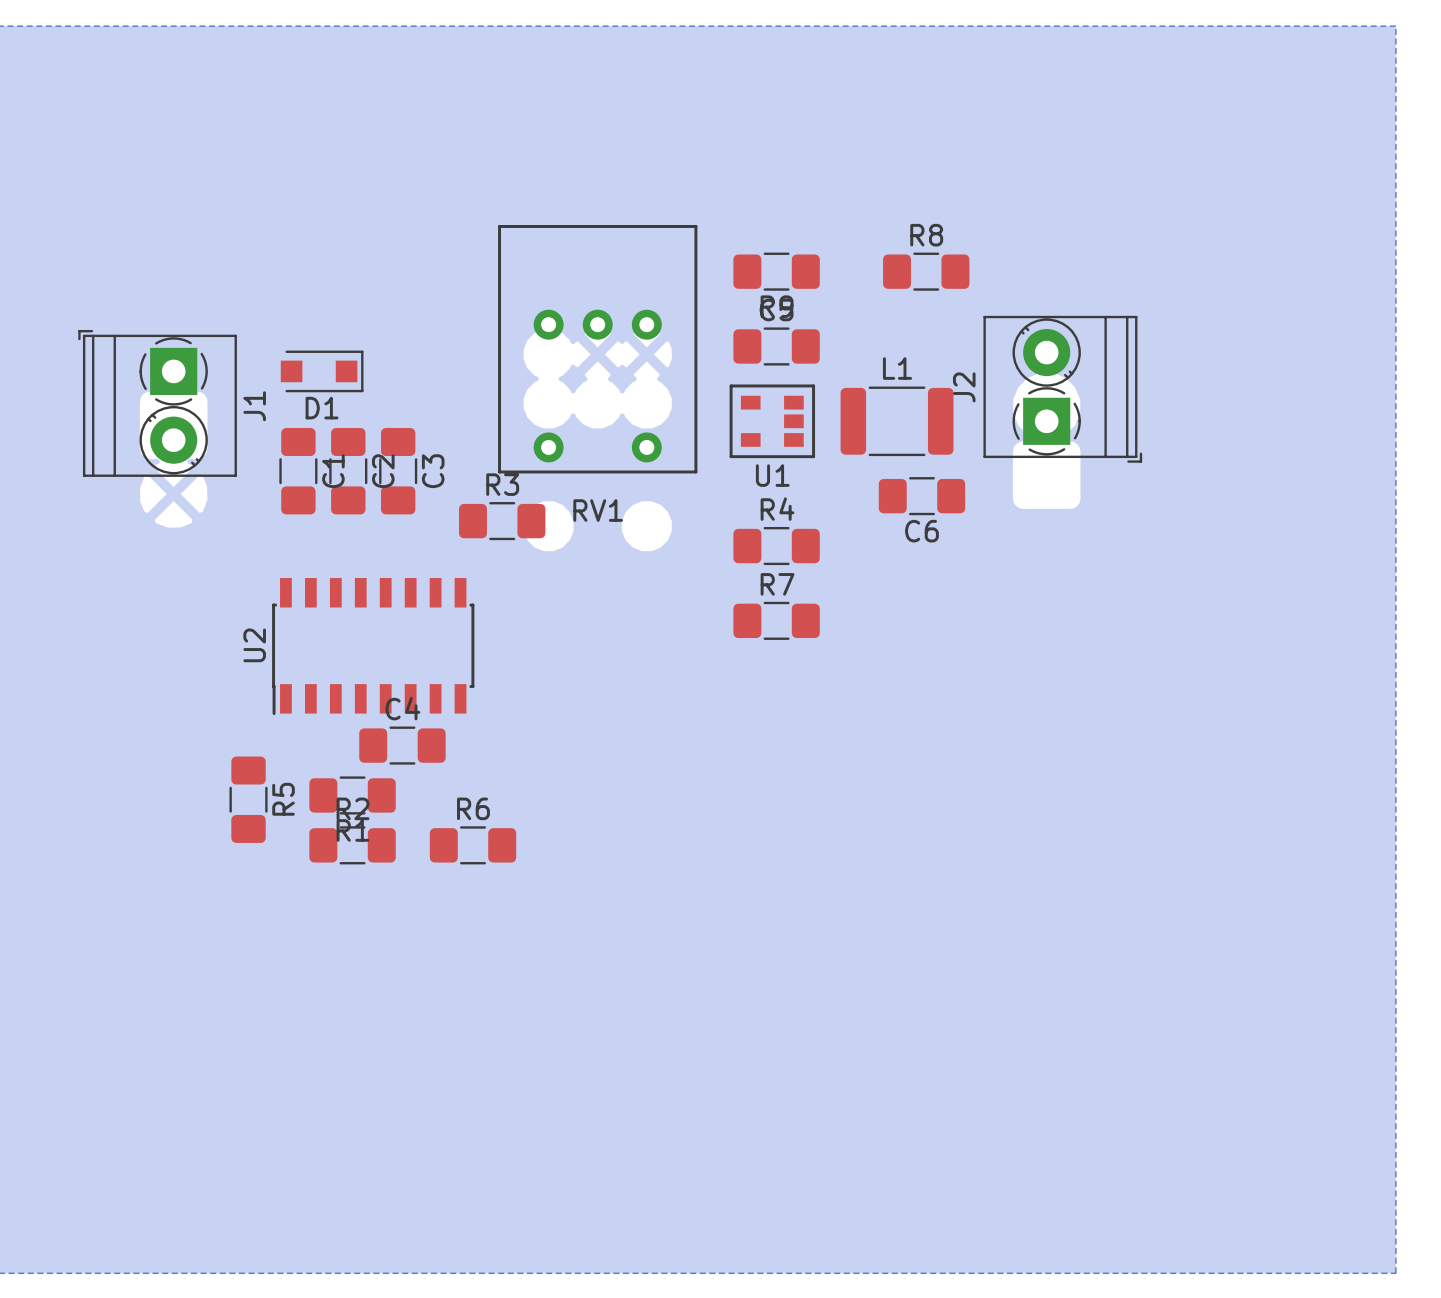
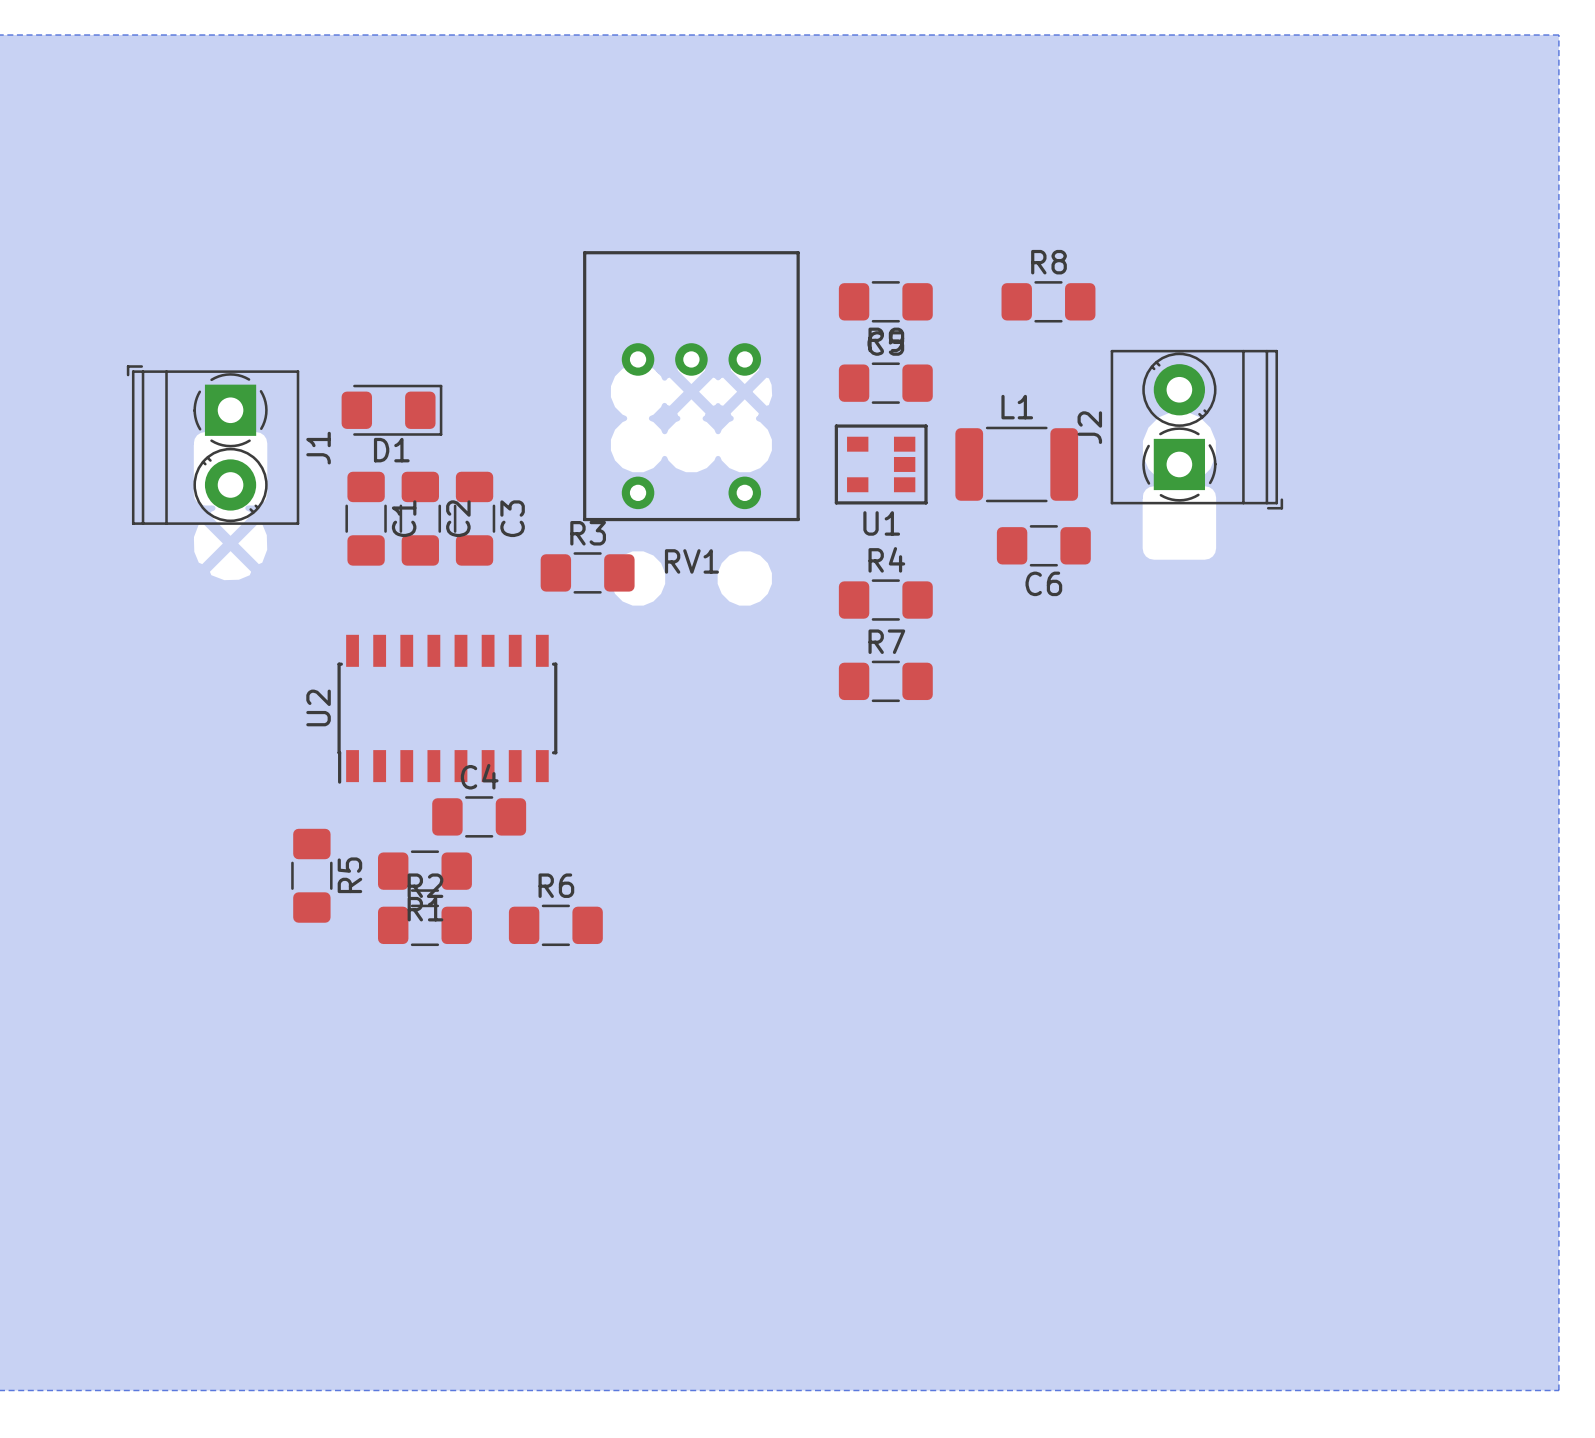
D1 footprint: [280, 350, 364, 393] -> [341, 384, 443, 436]

